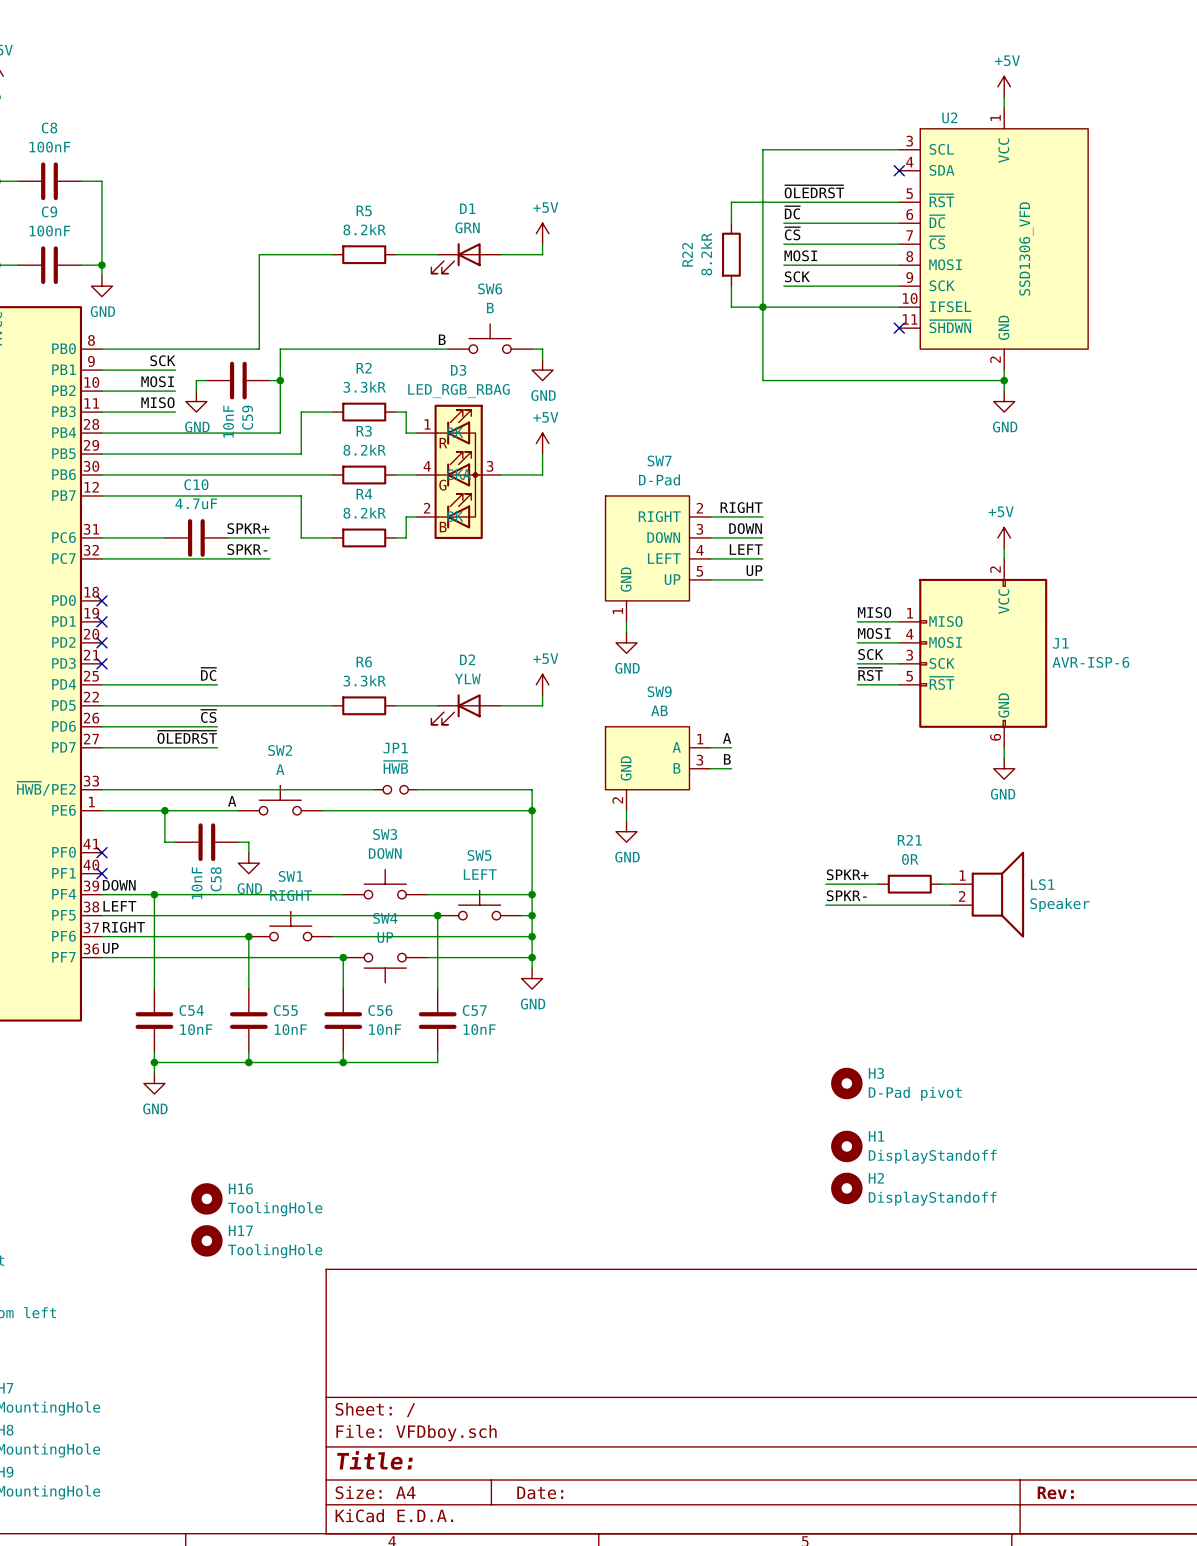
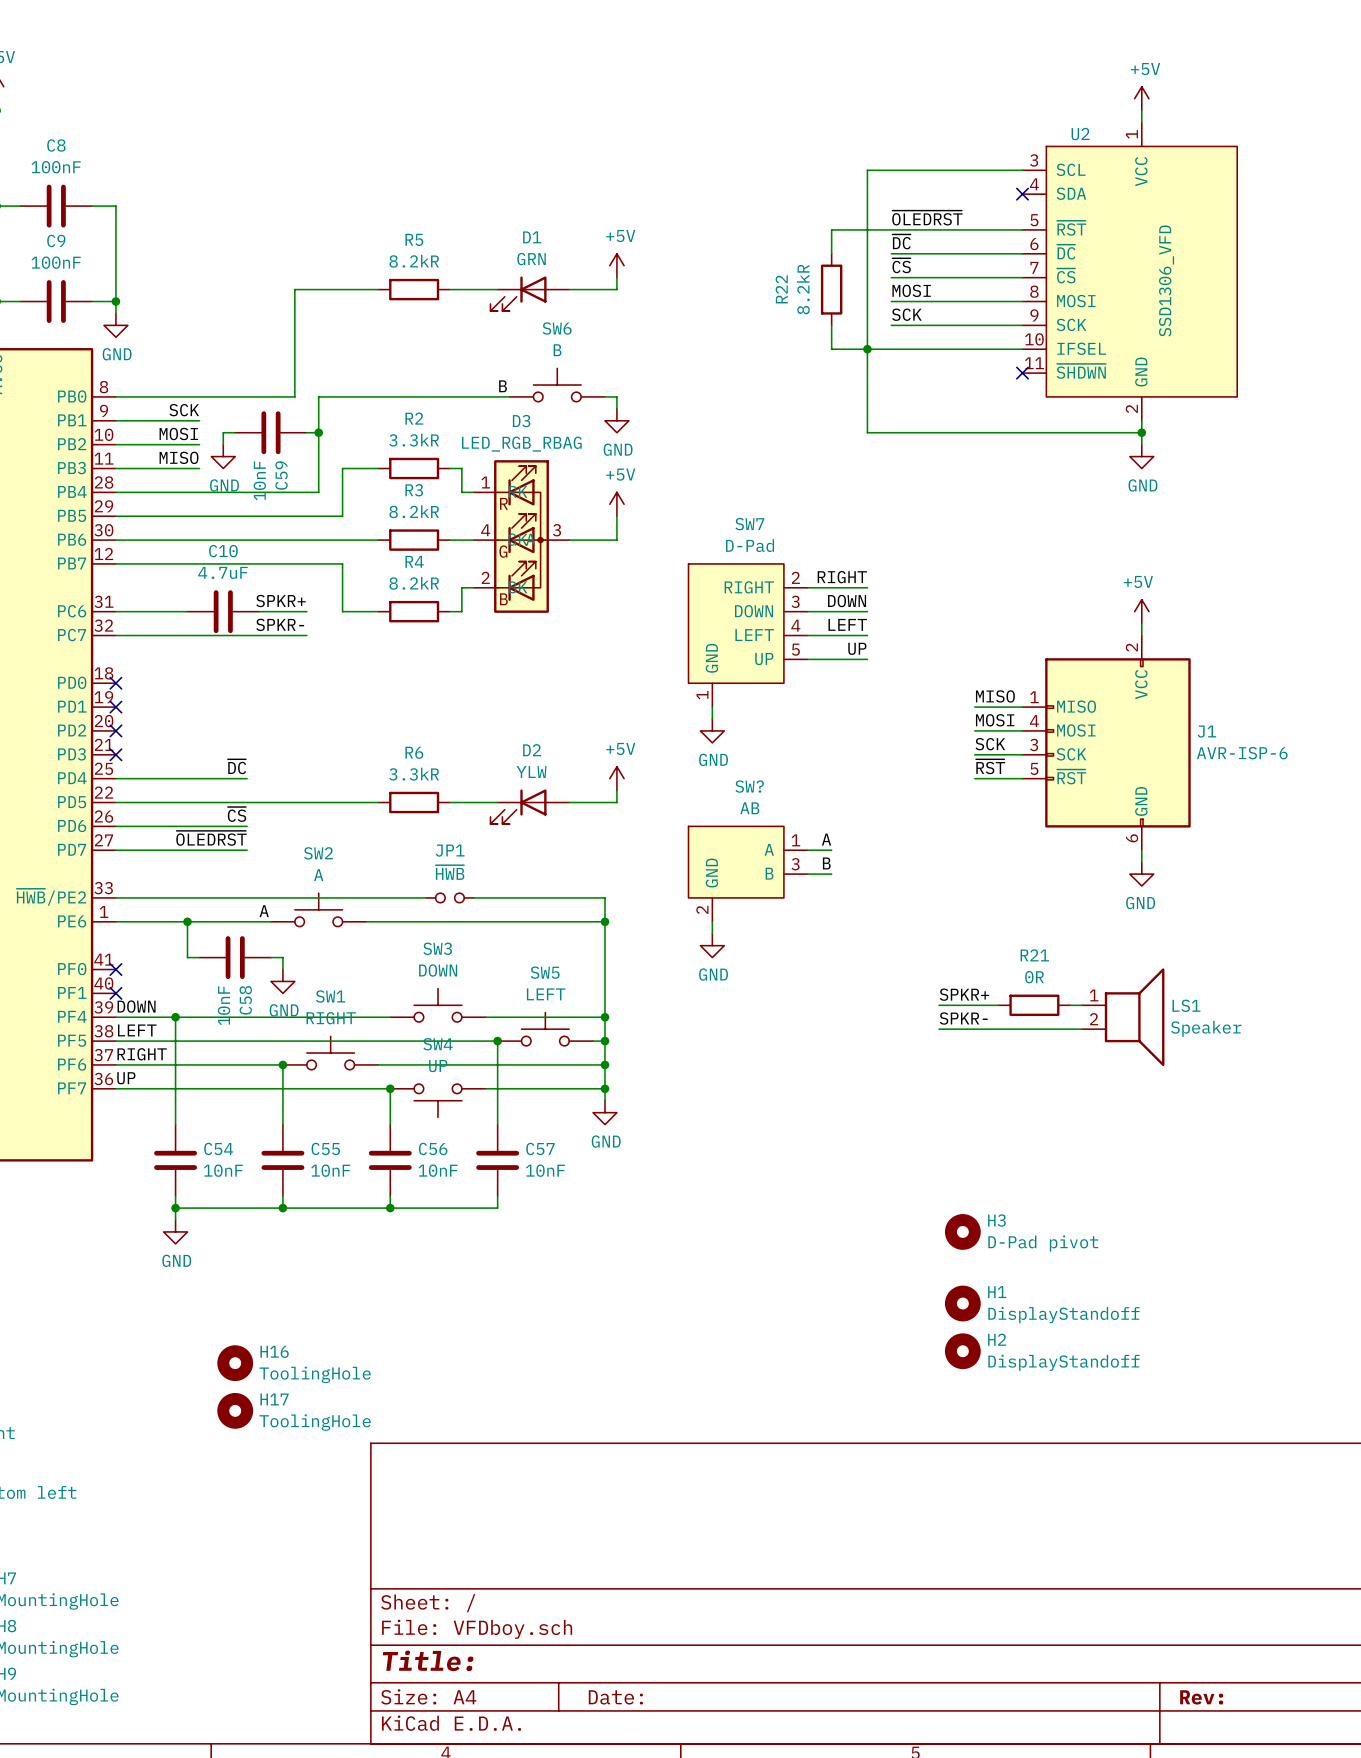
SW9 name: SW9 (659, 691) -> SW? (749, 786)

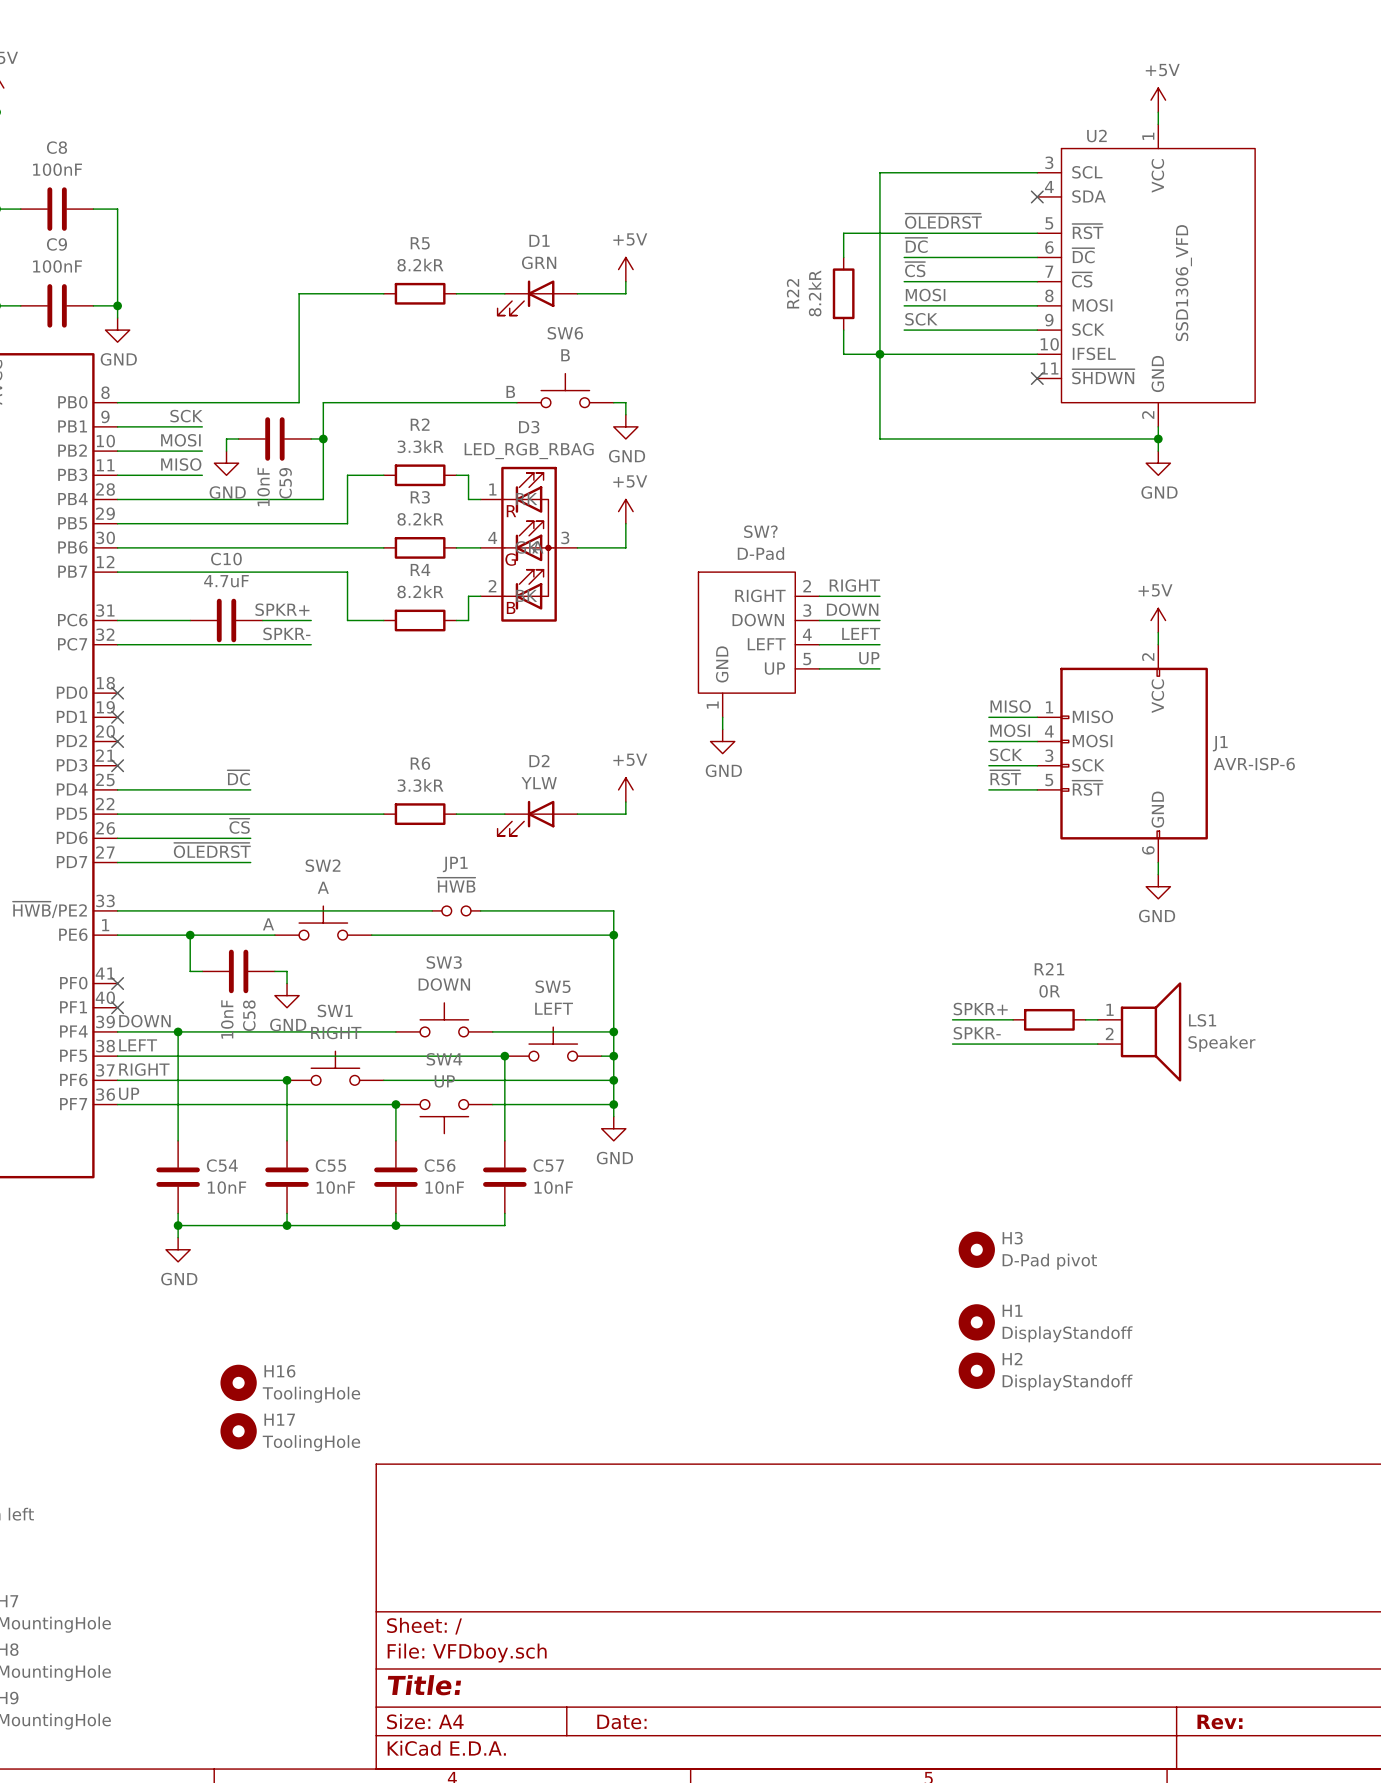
SW7 name: SW7 (749, 524) -> SW? (760, 531)
label: A (826, 839) -> none
wire: (807, 850) (831, 850) -> none
label: B (826, 863) -> none
SW?: AB (748, 874) -> none
wire: (807, 874) (831, 874) -> none
wire: (712, 921) (712, 933) -> none
power symbol: GND (712, 945) -> none

